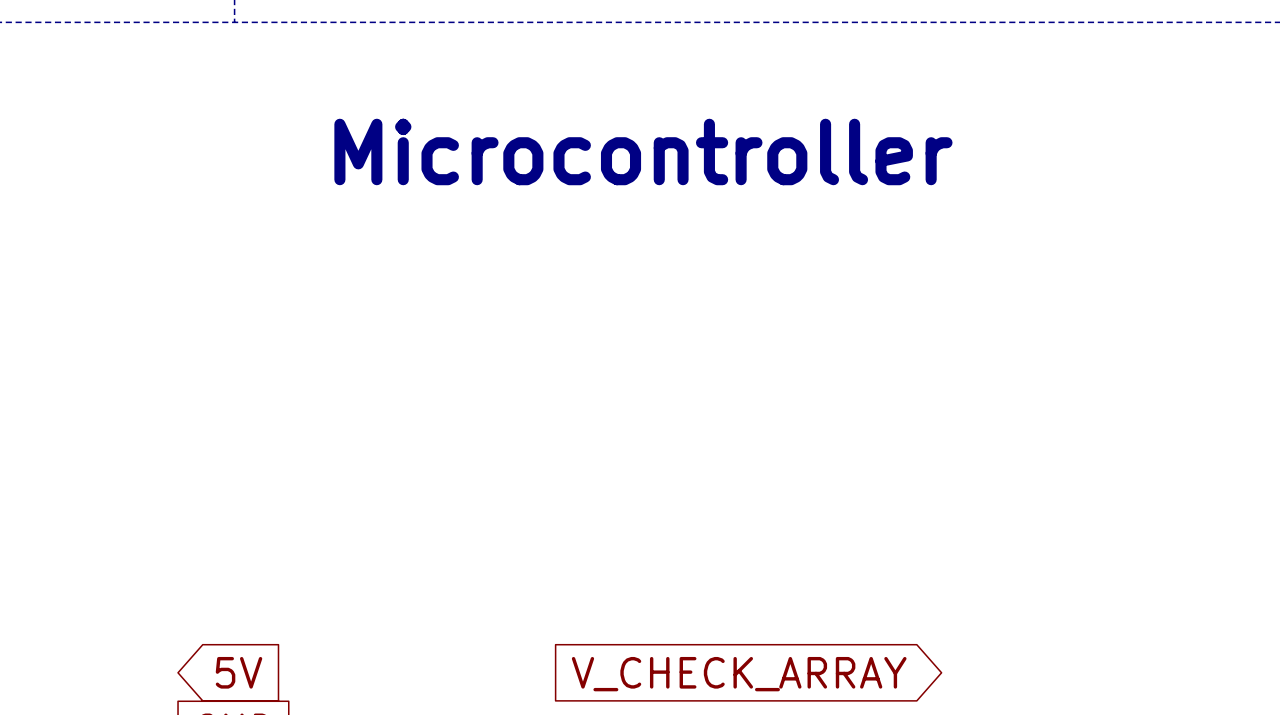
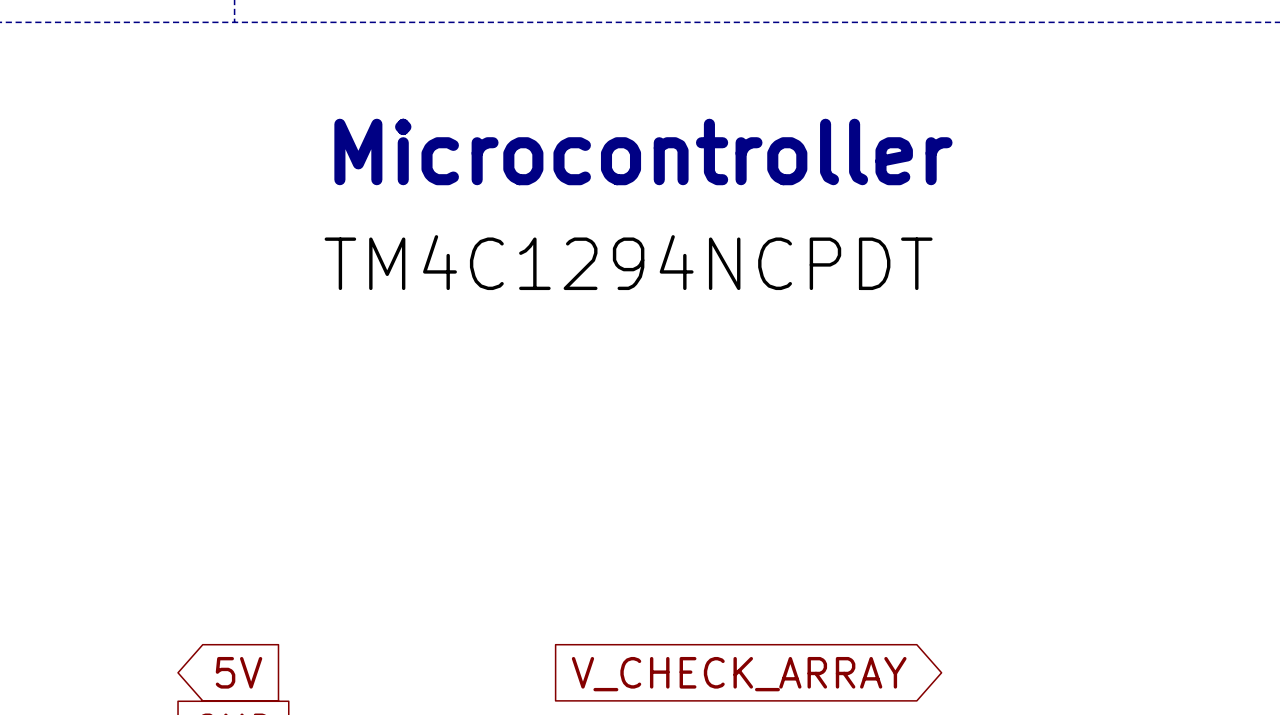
label: none -> TM4C1294NCPDT (628, 262)

